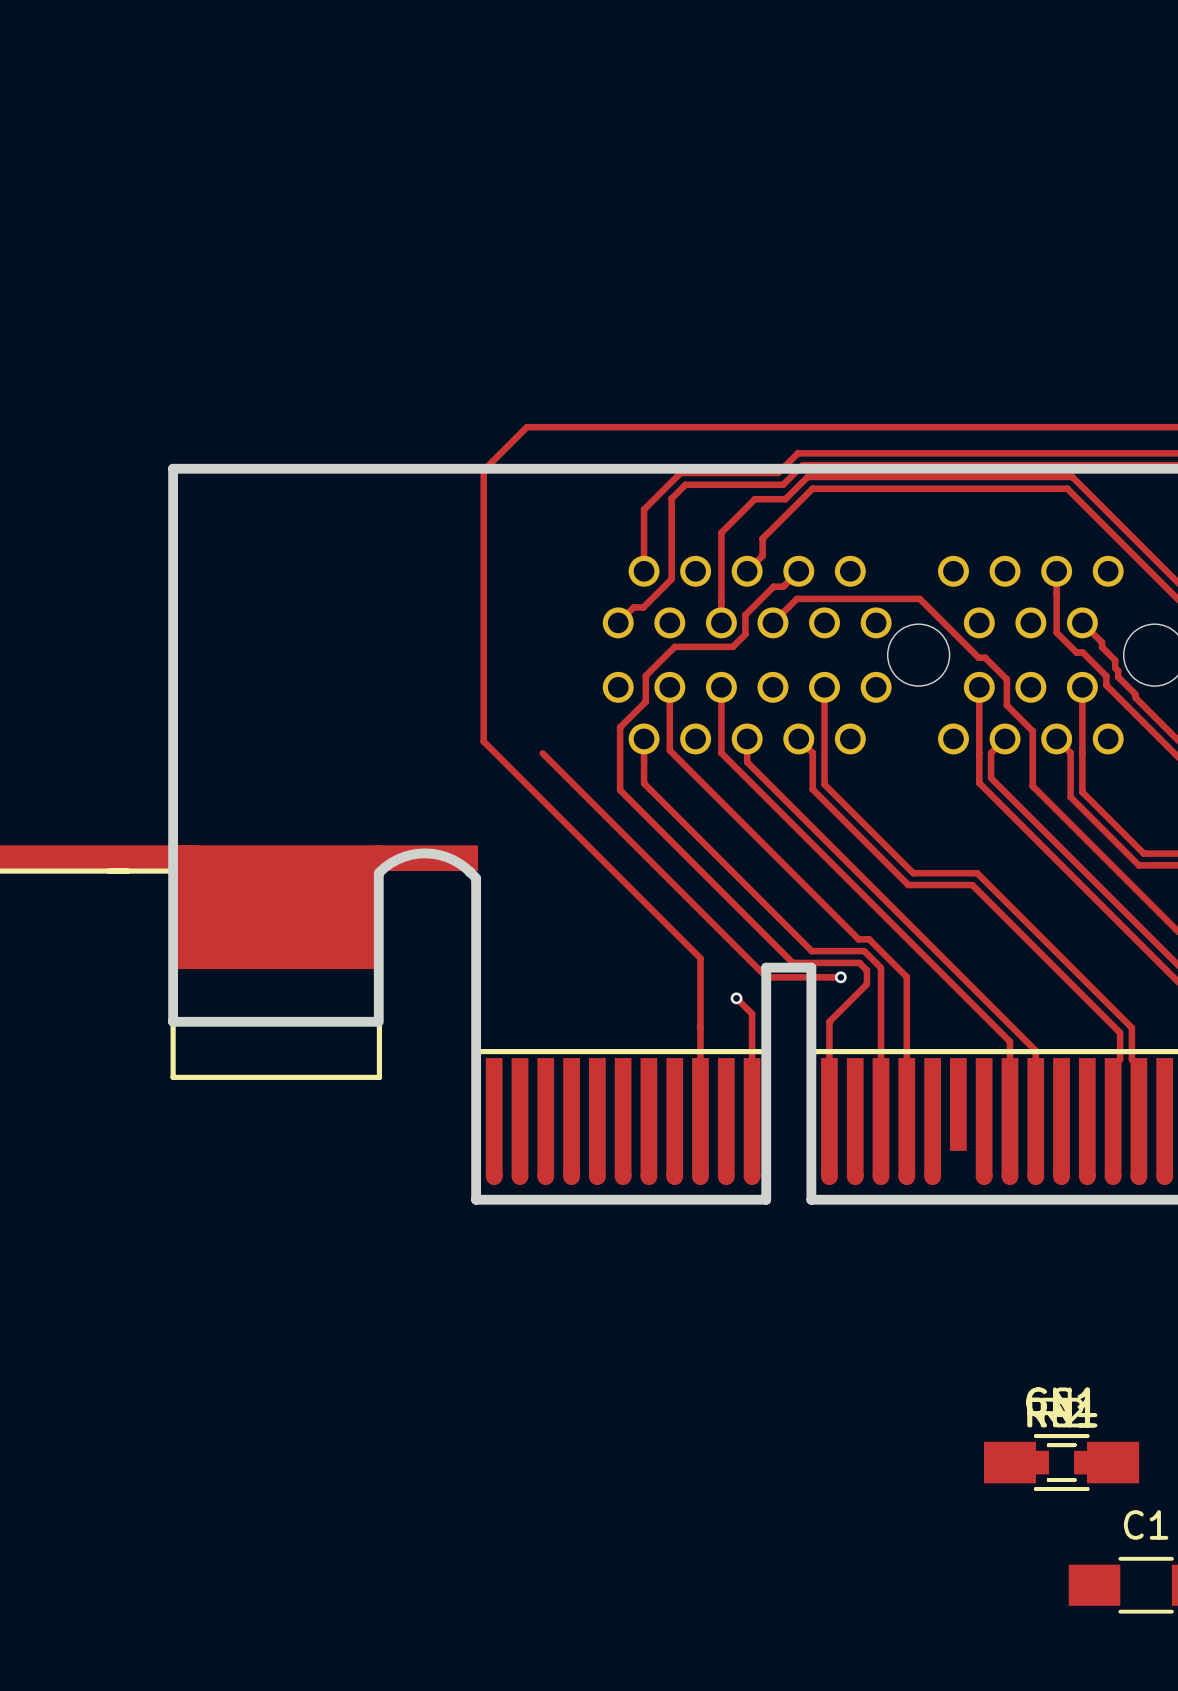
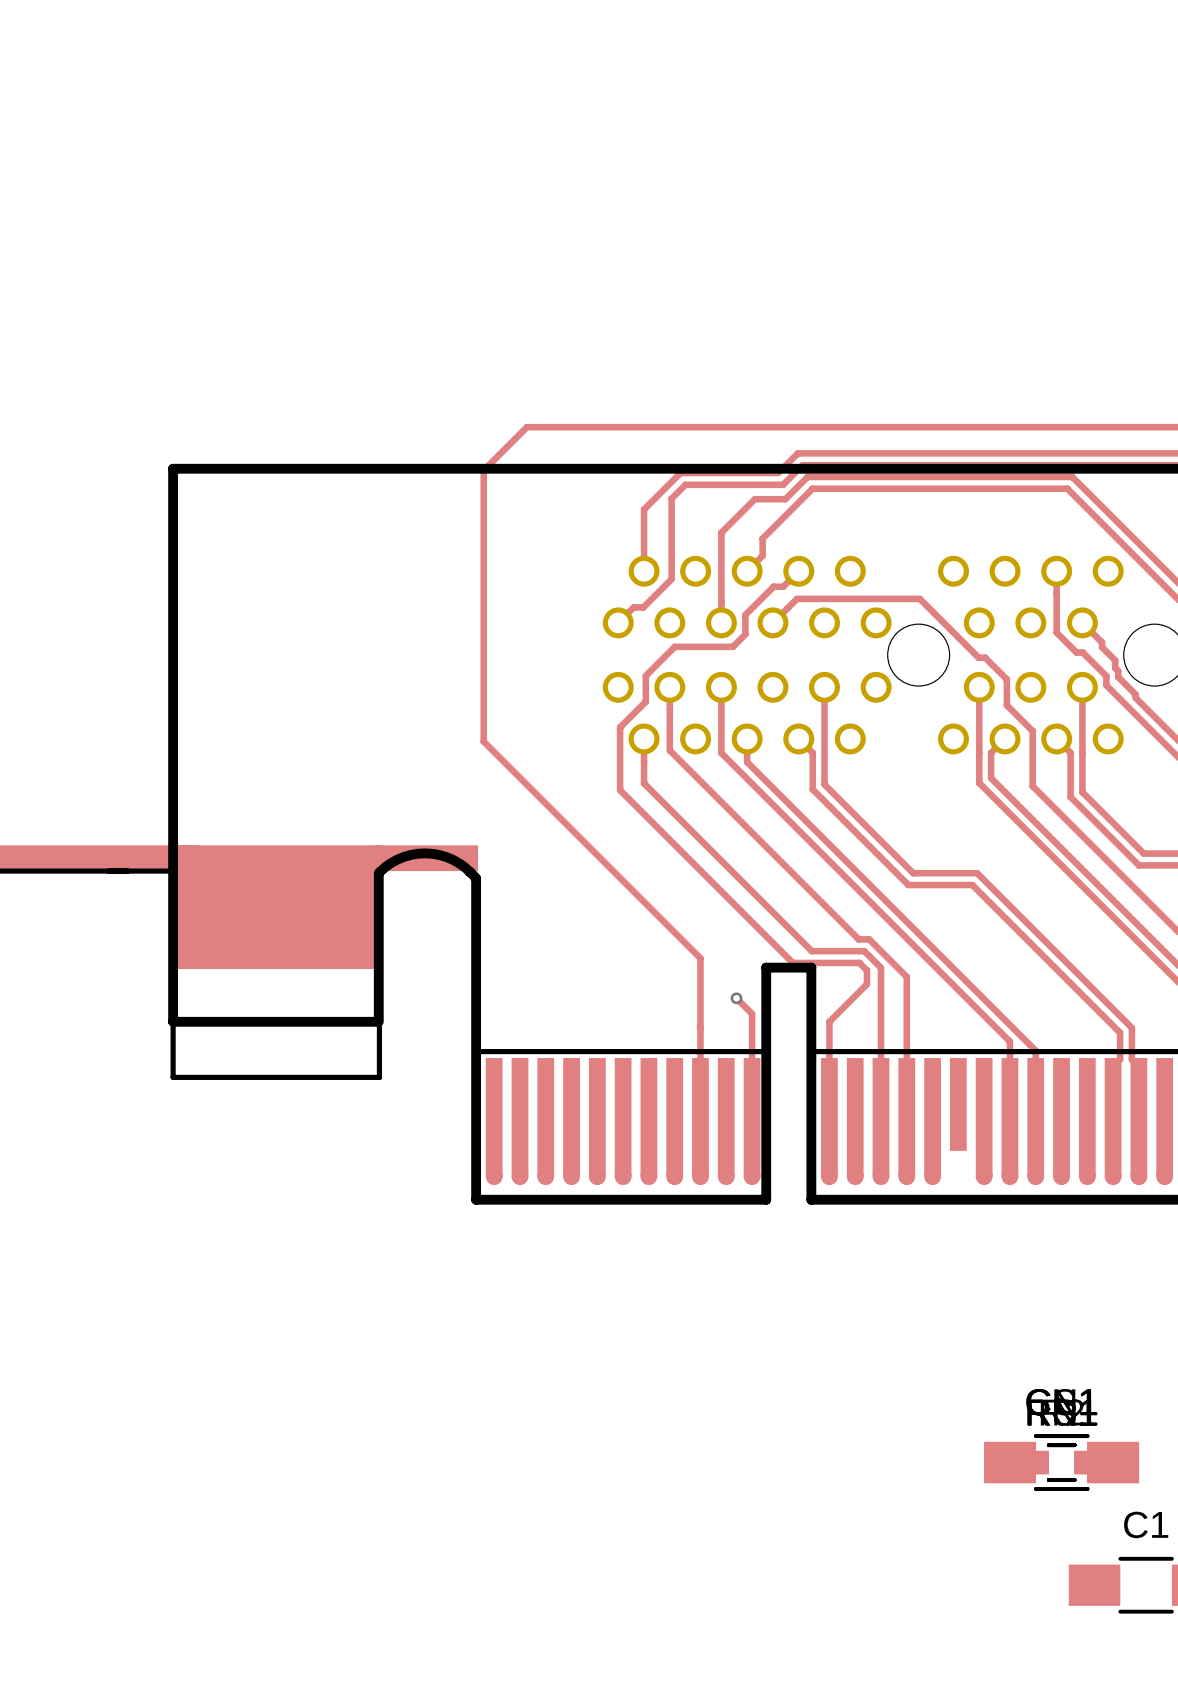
track: (542, 753) (766, 977) (840, 977) -> none
via: (840, 977) -> none

